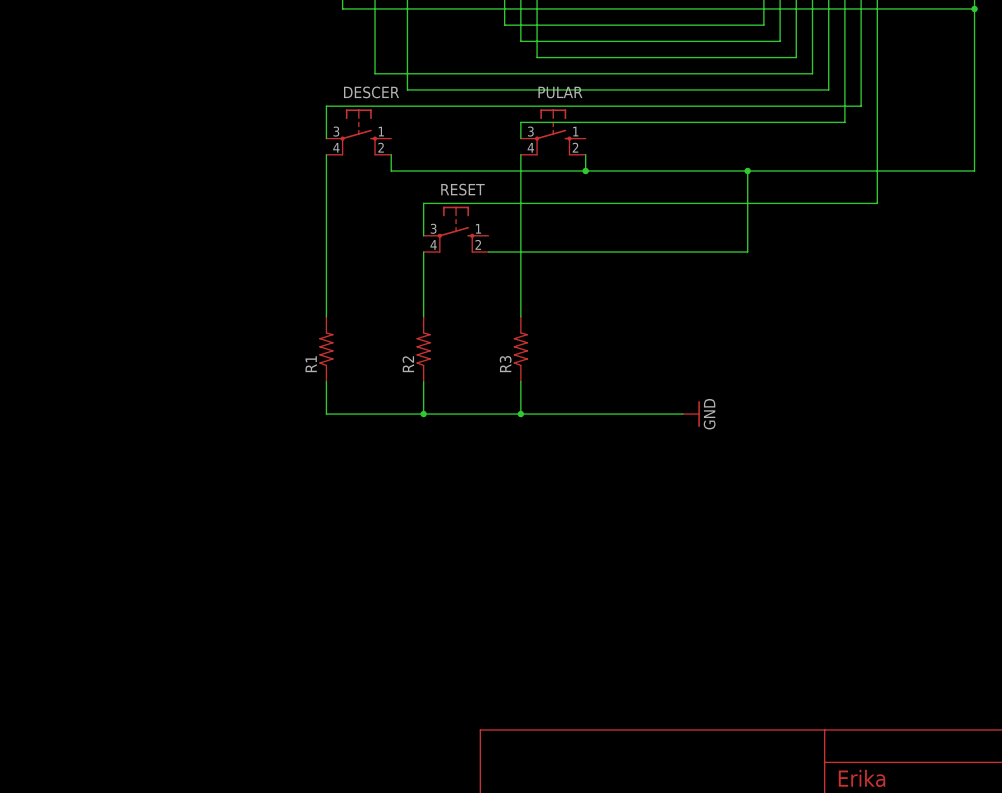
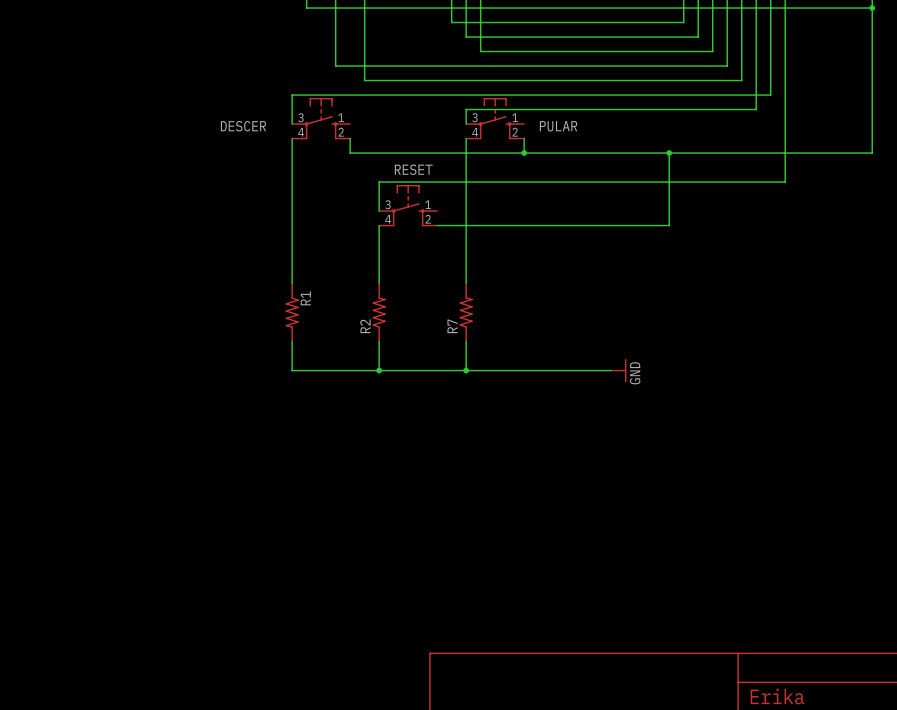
DESCER name position: DESCER (371, 92) -> DESCER (243, 126)
PULAR name position: PULAR (560, 92) -> PULAR (558, 126)
R1 rotation: 0° (326, 349) -> 180° (292, 312)
R3 name: R3 (505, 364) -> R7 (452, 326)

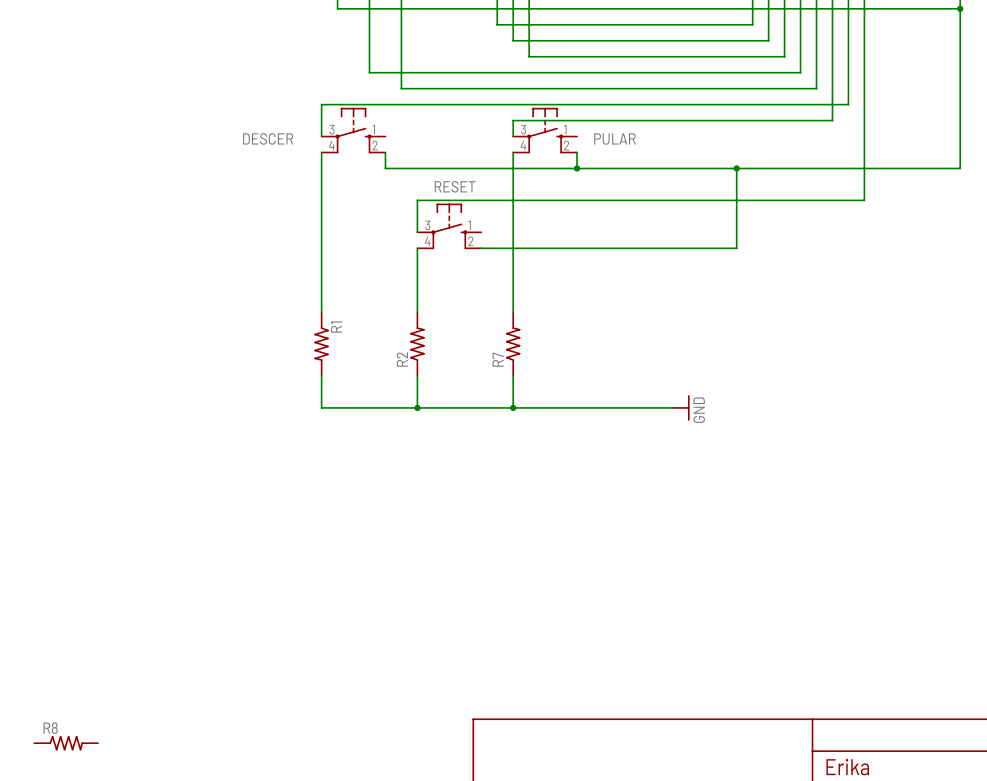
R8: none -> (66, 743)

